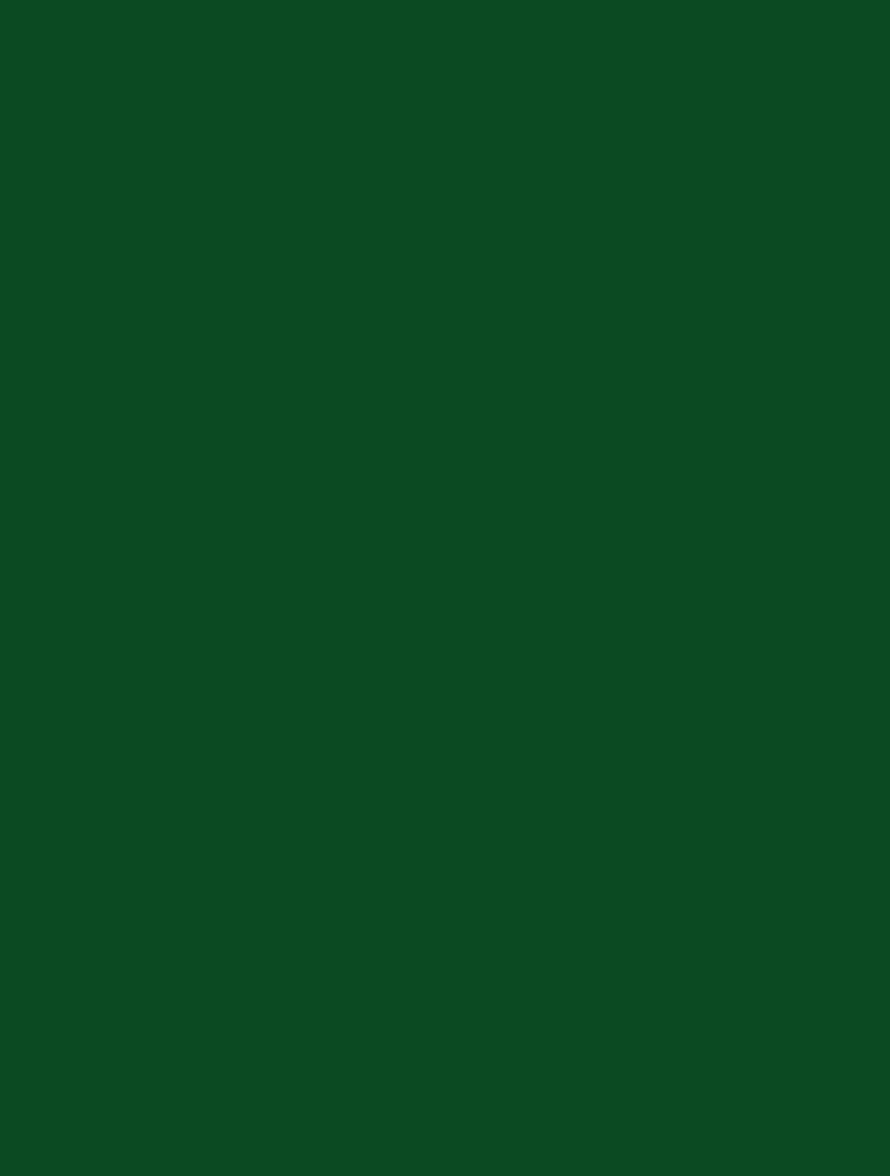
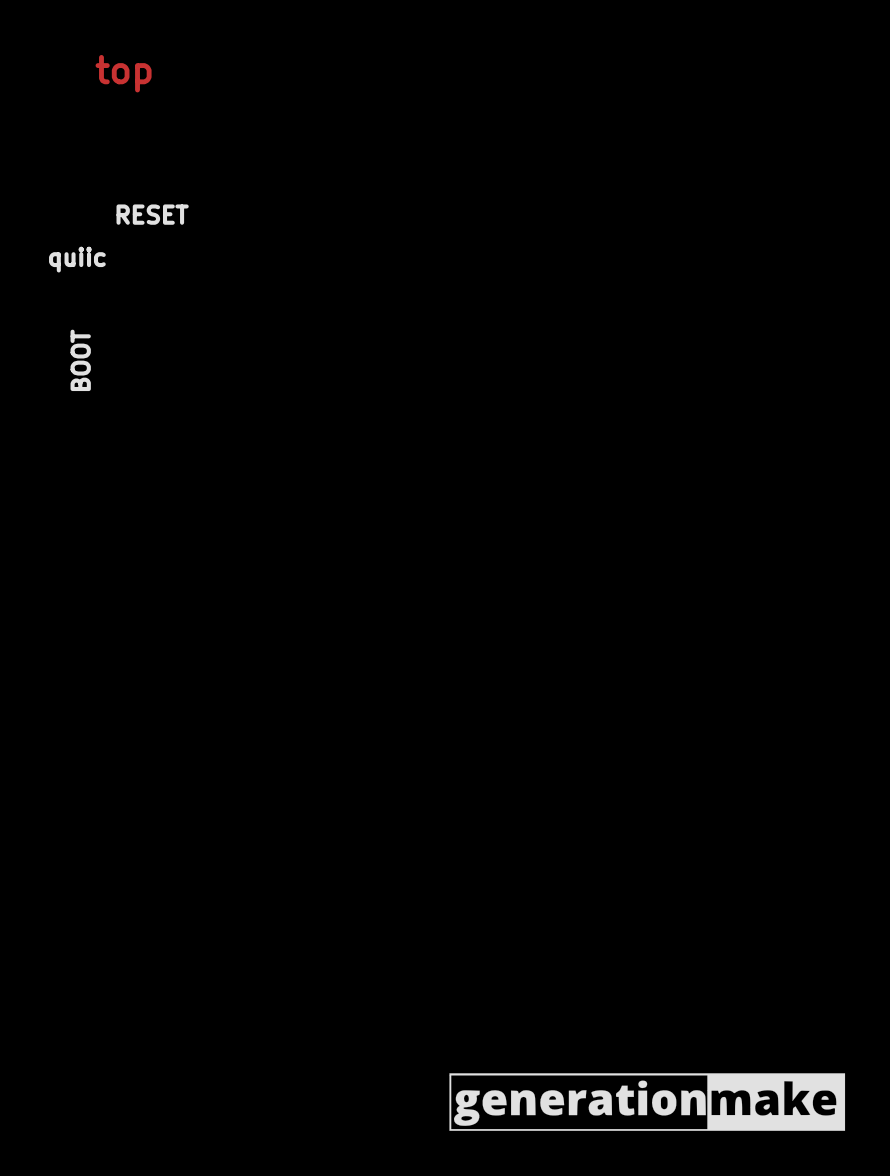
text: none -> top (123, 73)
text: none -> RESET (152, 214)
text: none -> quiic (77, 259)
text: none -> BOOT (80, 360)
drawing: none -> [449, 1073, 846, 1131]

